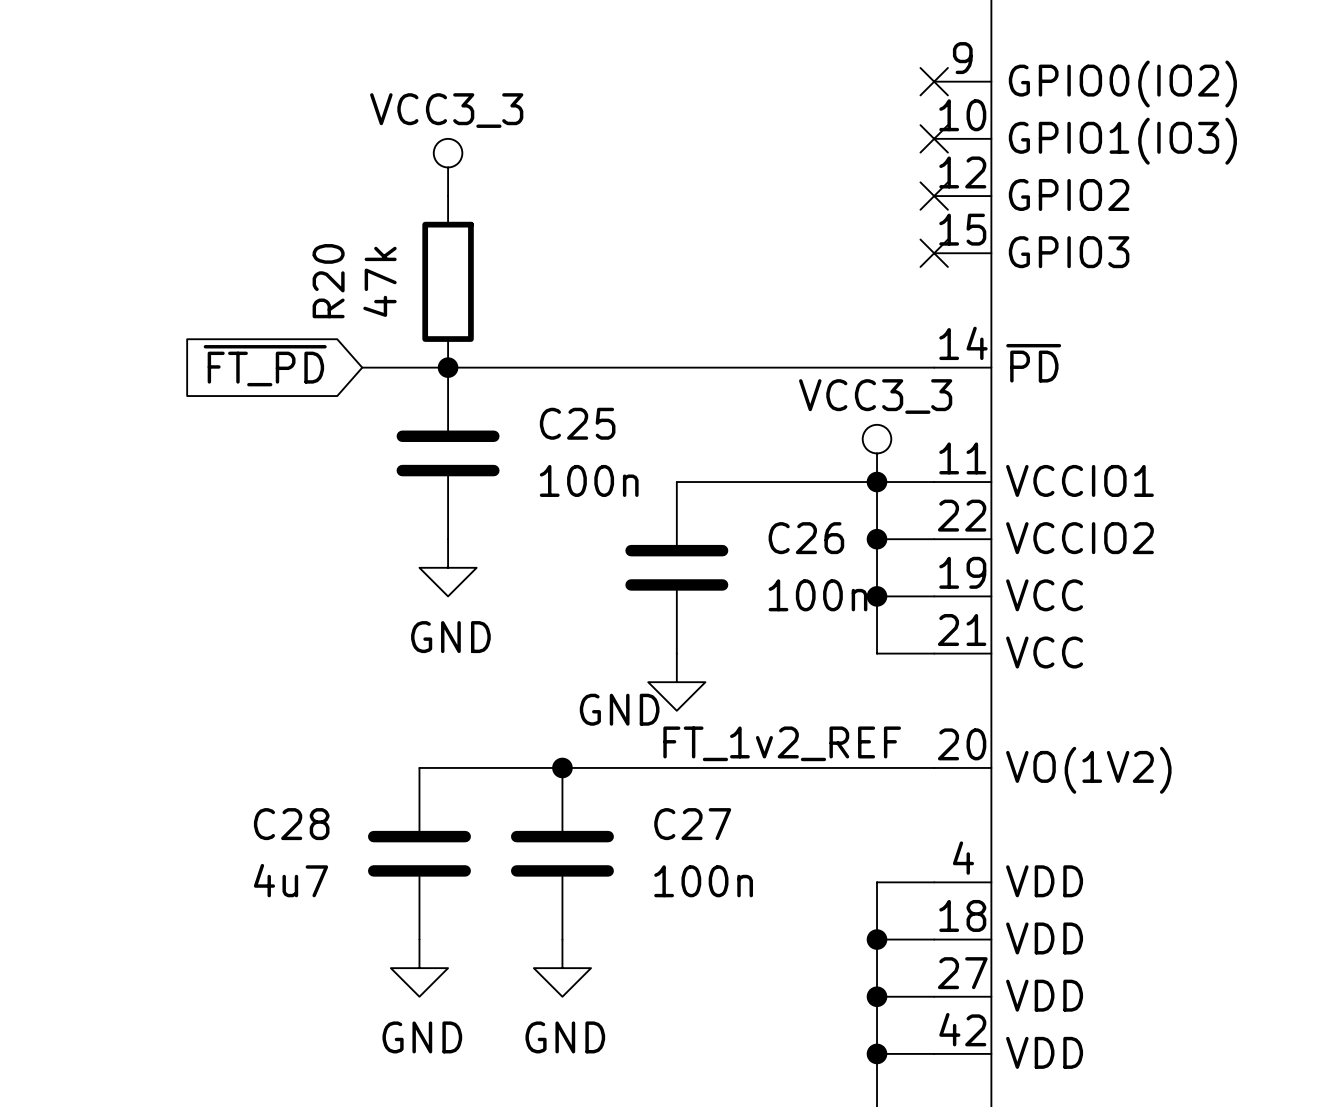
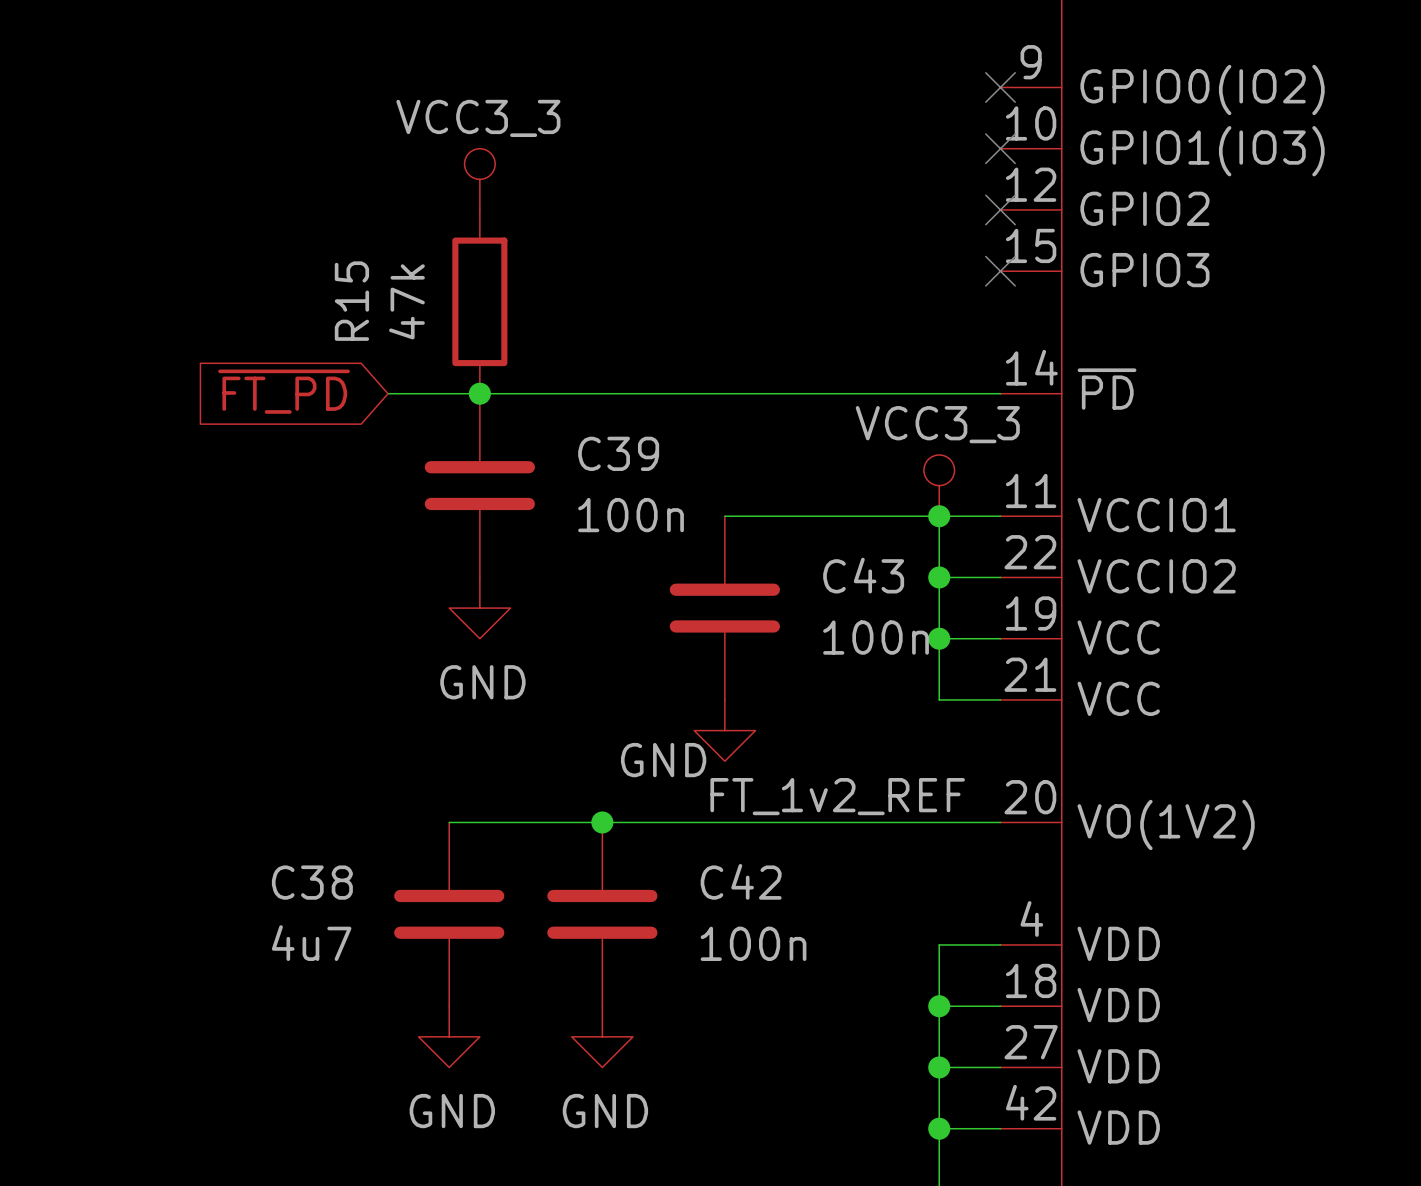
R20 name: R20 (328, 281) -> R15 (351, 301)
C25 name: C25 (577, 423) -> C39 (618, 453)
C26 name: C26 (806, 538) -> C43 (863, 575)
C28 name: C28 (291, 824) -> C38 (312, 882)
C27 name: C27 (692, 824) -> C42 (741, 881)

